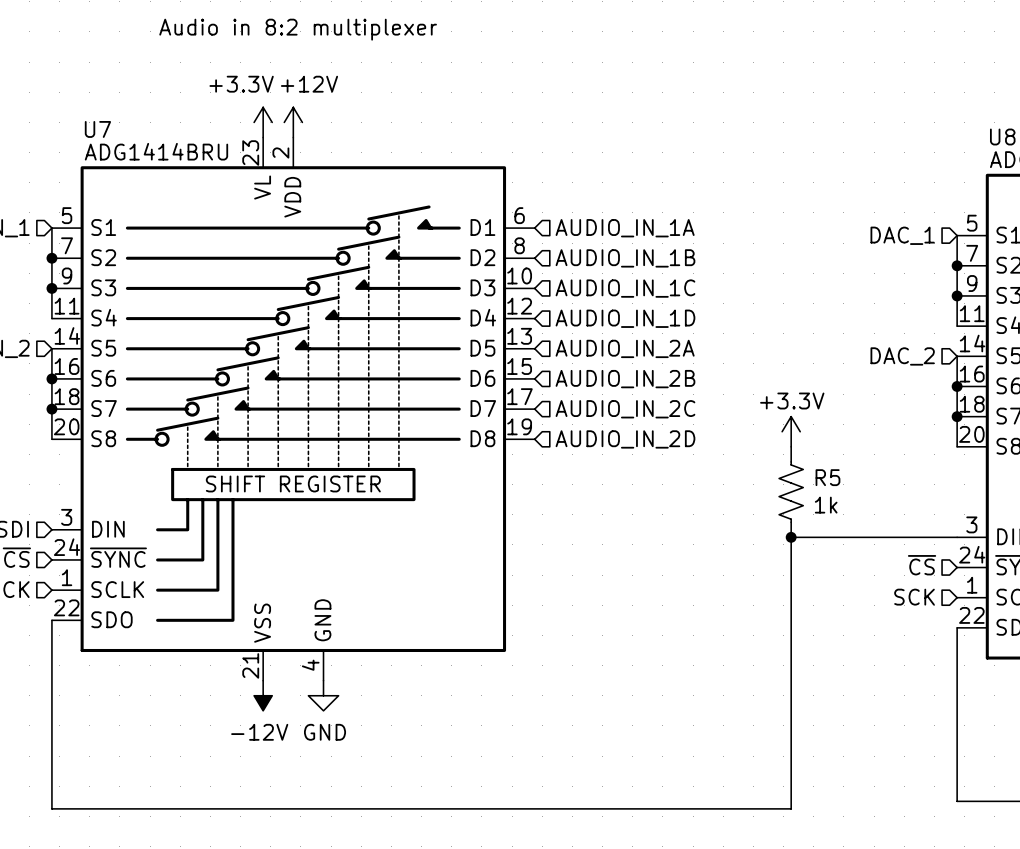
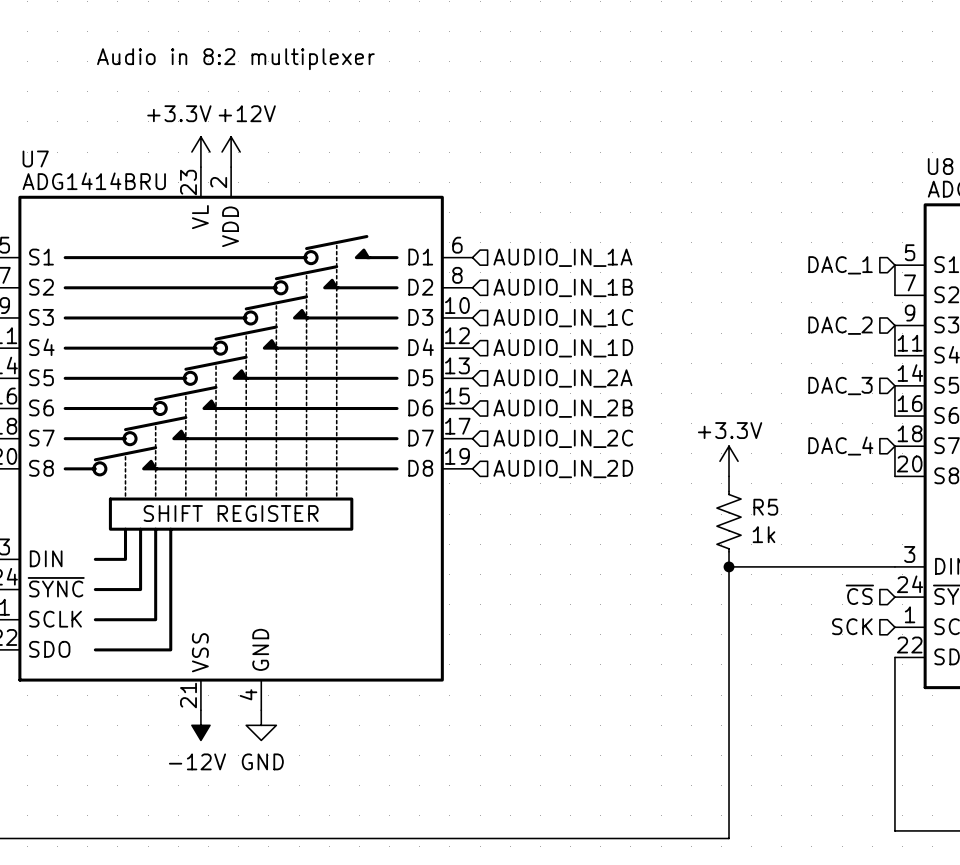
wire: (957, 265) (957, 295) -> none
junction: (957, 265) -> none
junction: (957, 295) -> none
hierarchical label: none -> DAC_2 (840, 325)
hierarchical label: DAC_2 (902, 356) -> DAC_3 (840, 386)
wire: (957, 386) (957, 416) -> none
junction: (957, 386) -> none
hierarchical label: none -> DAC_4 (840, 446)
junction: (957, 416) -> none

